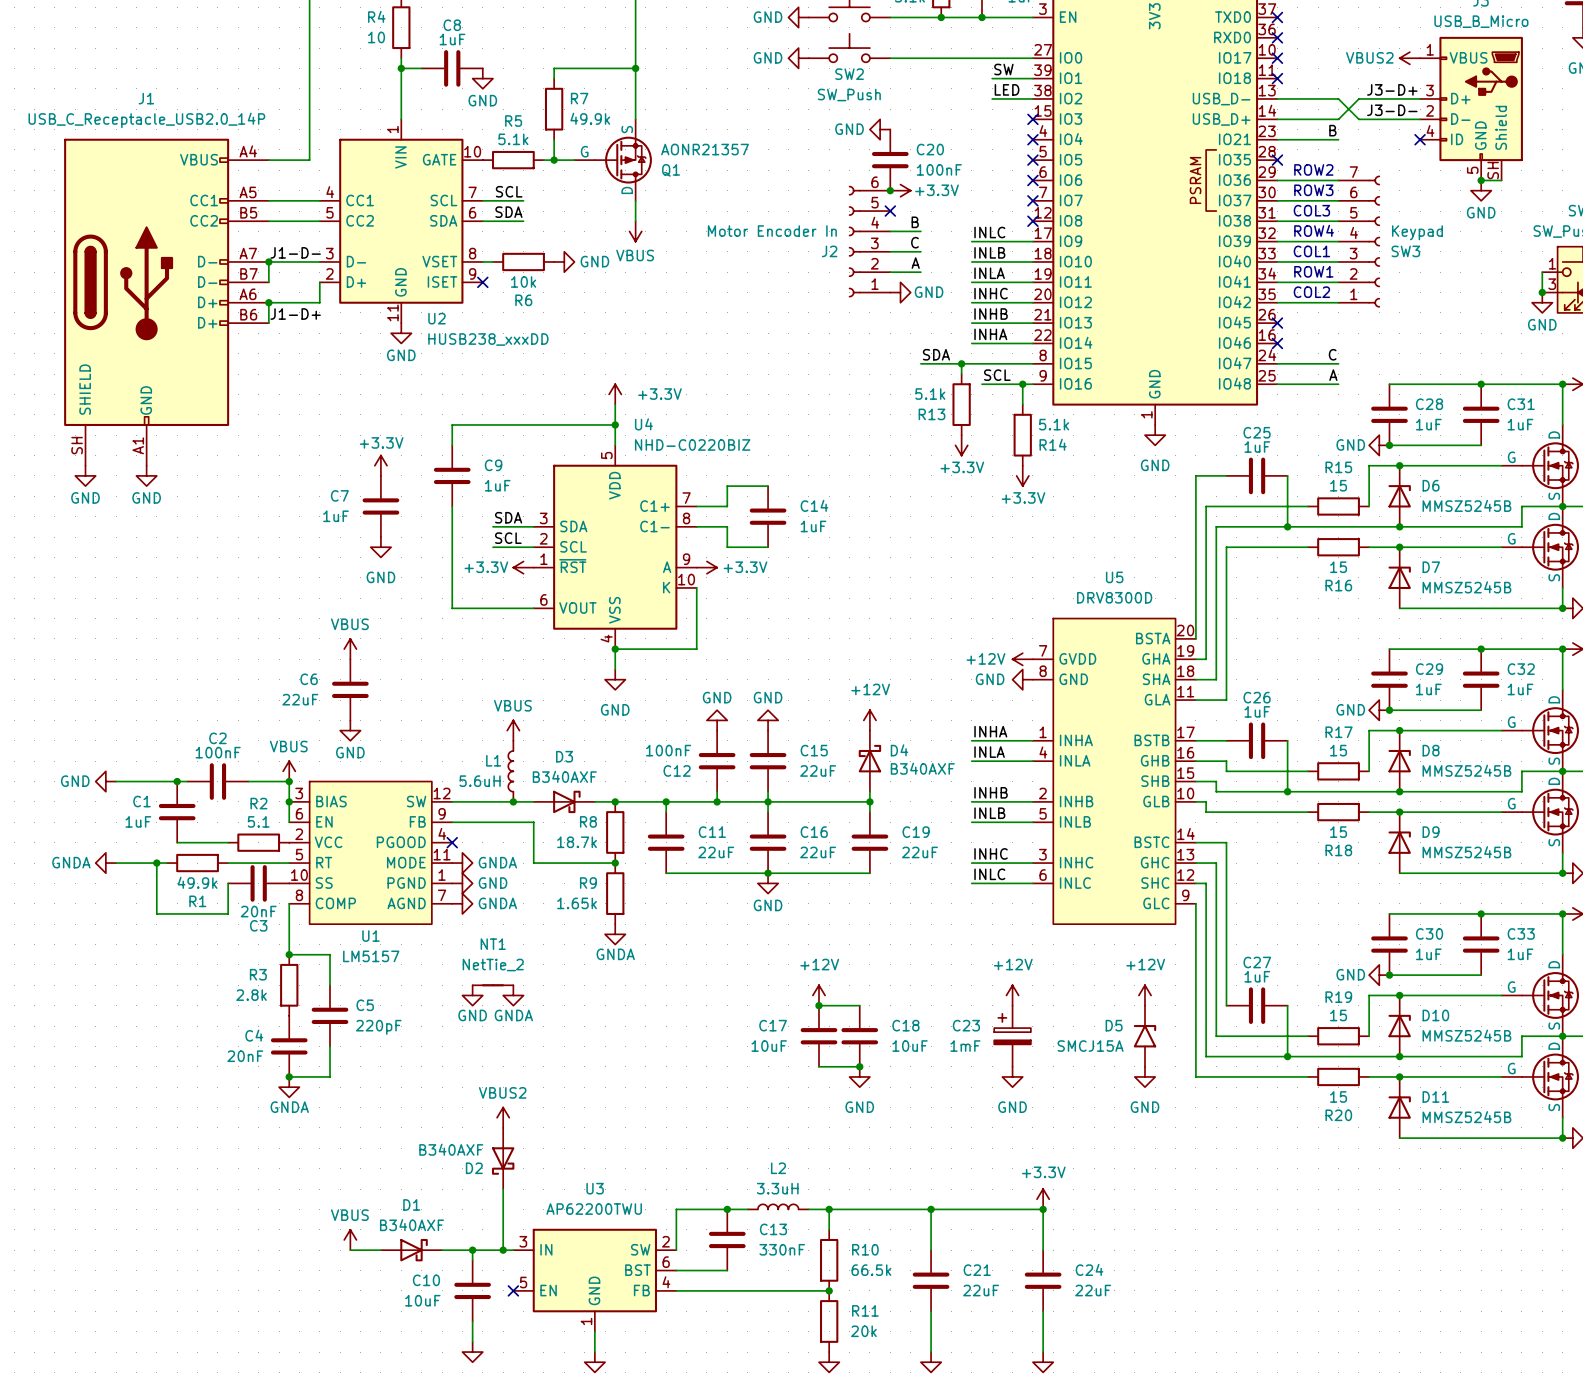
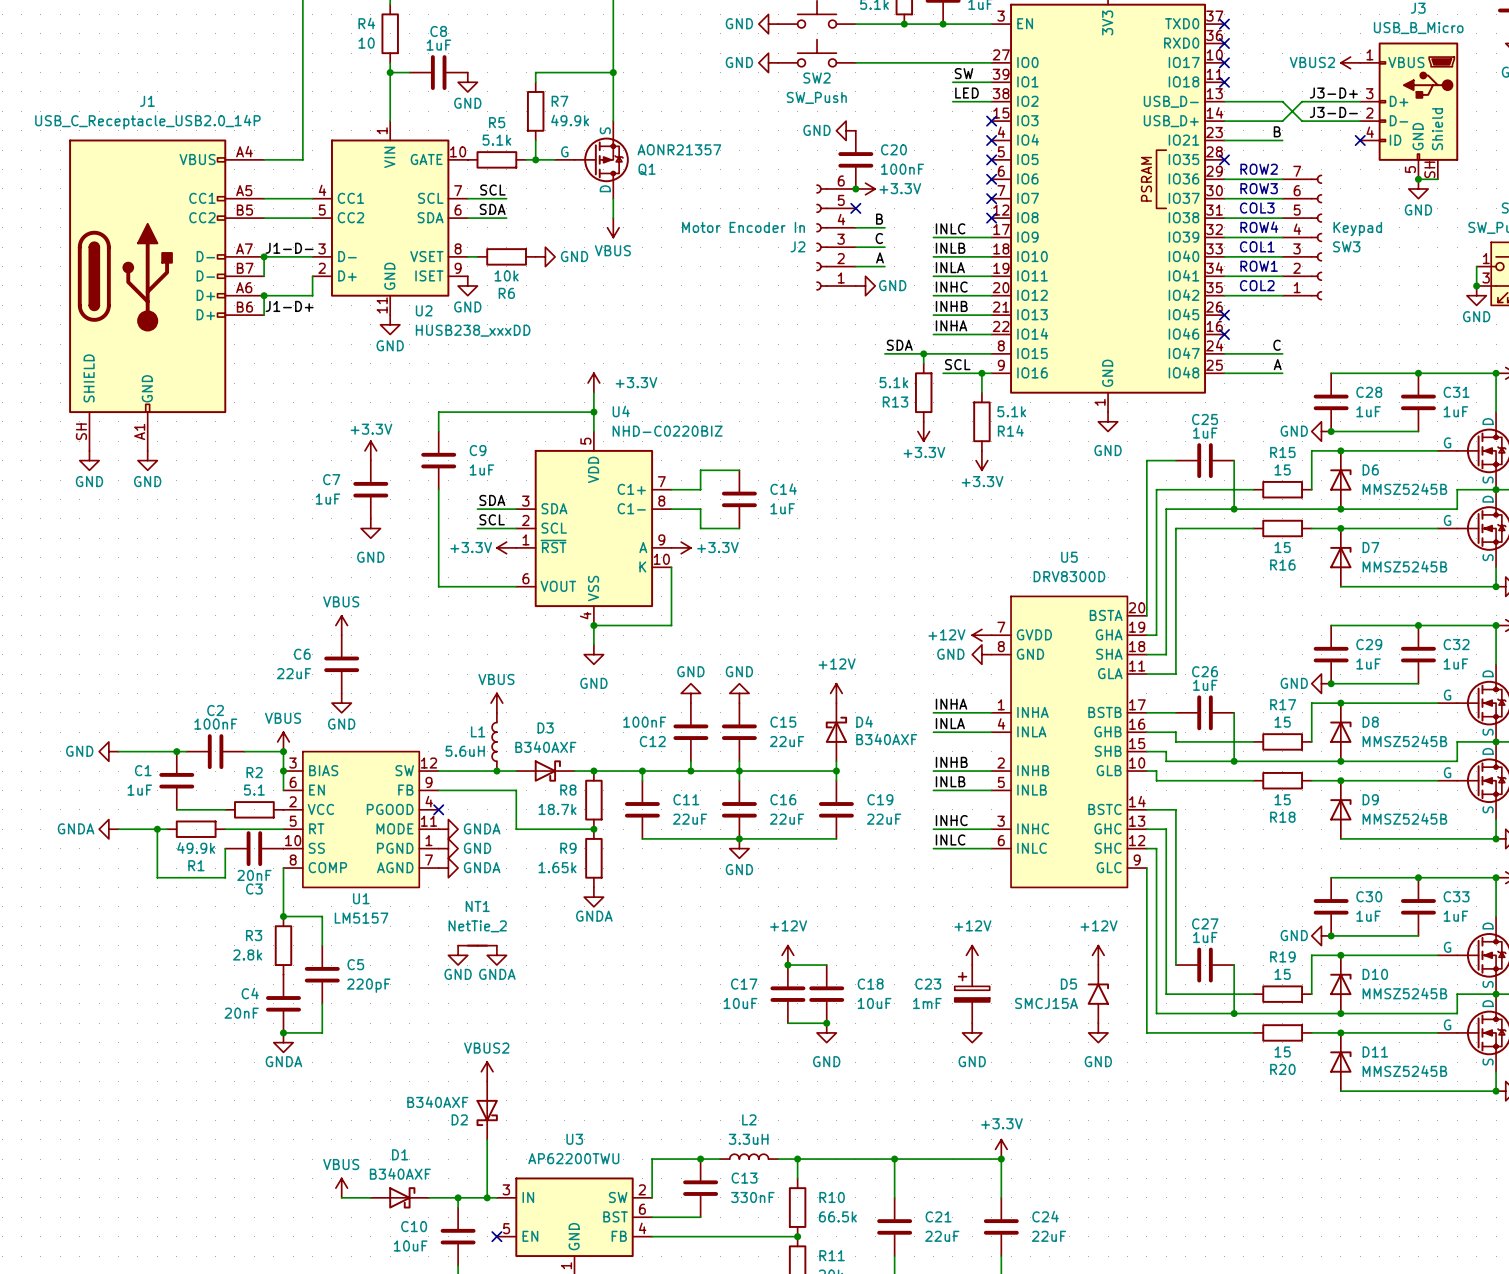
no-connect mark: (482, 282) -> none
power symbol: none -> GND (467, 285)

